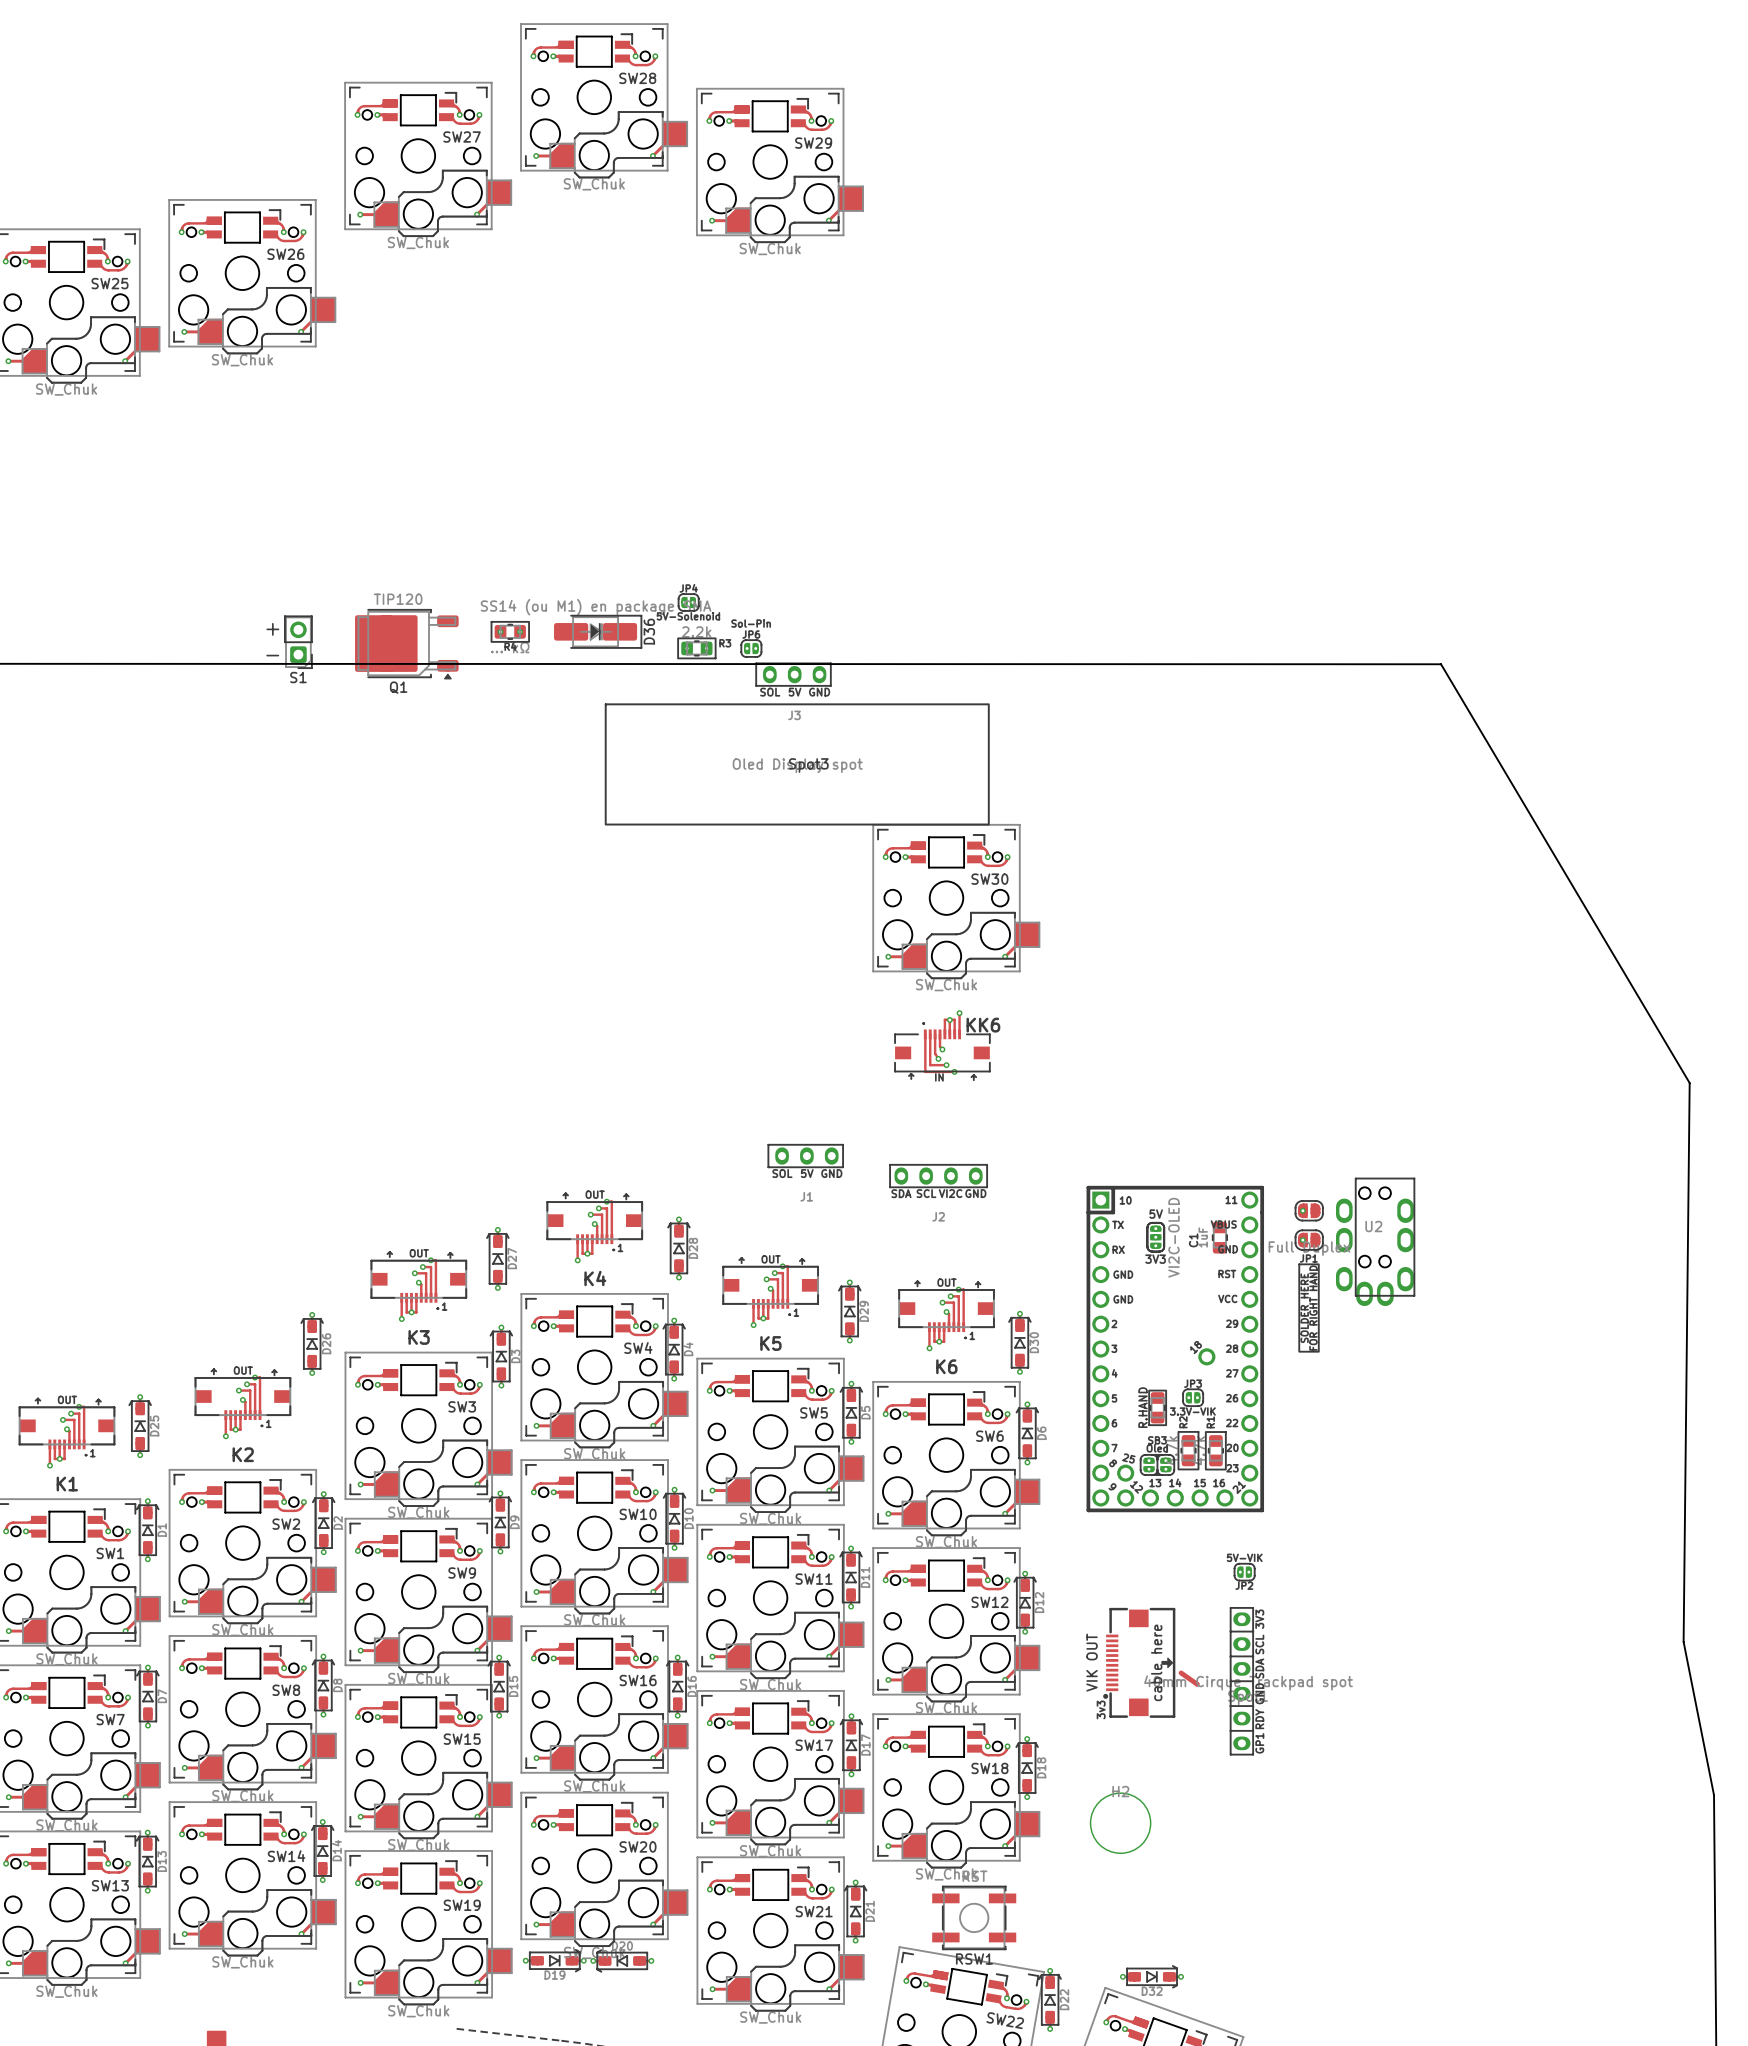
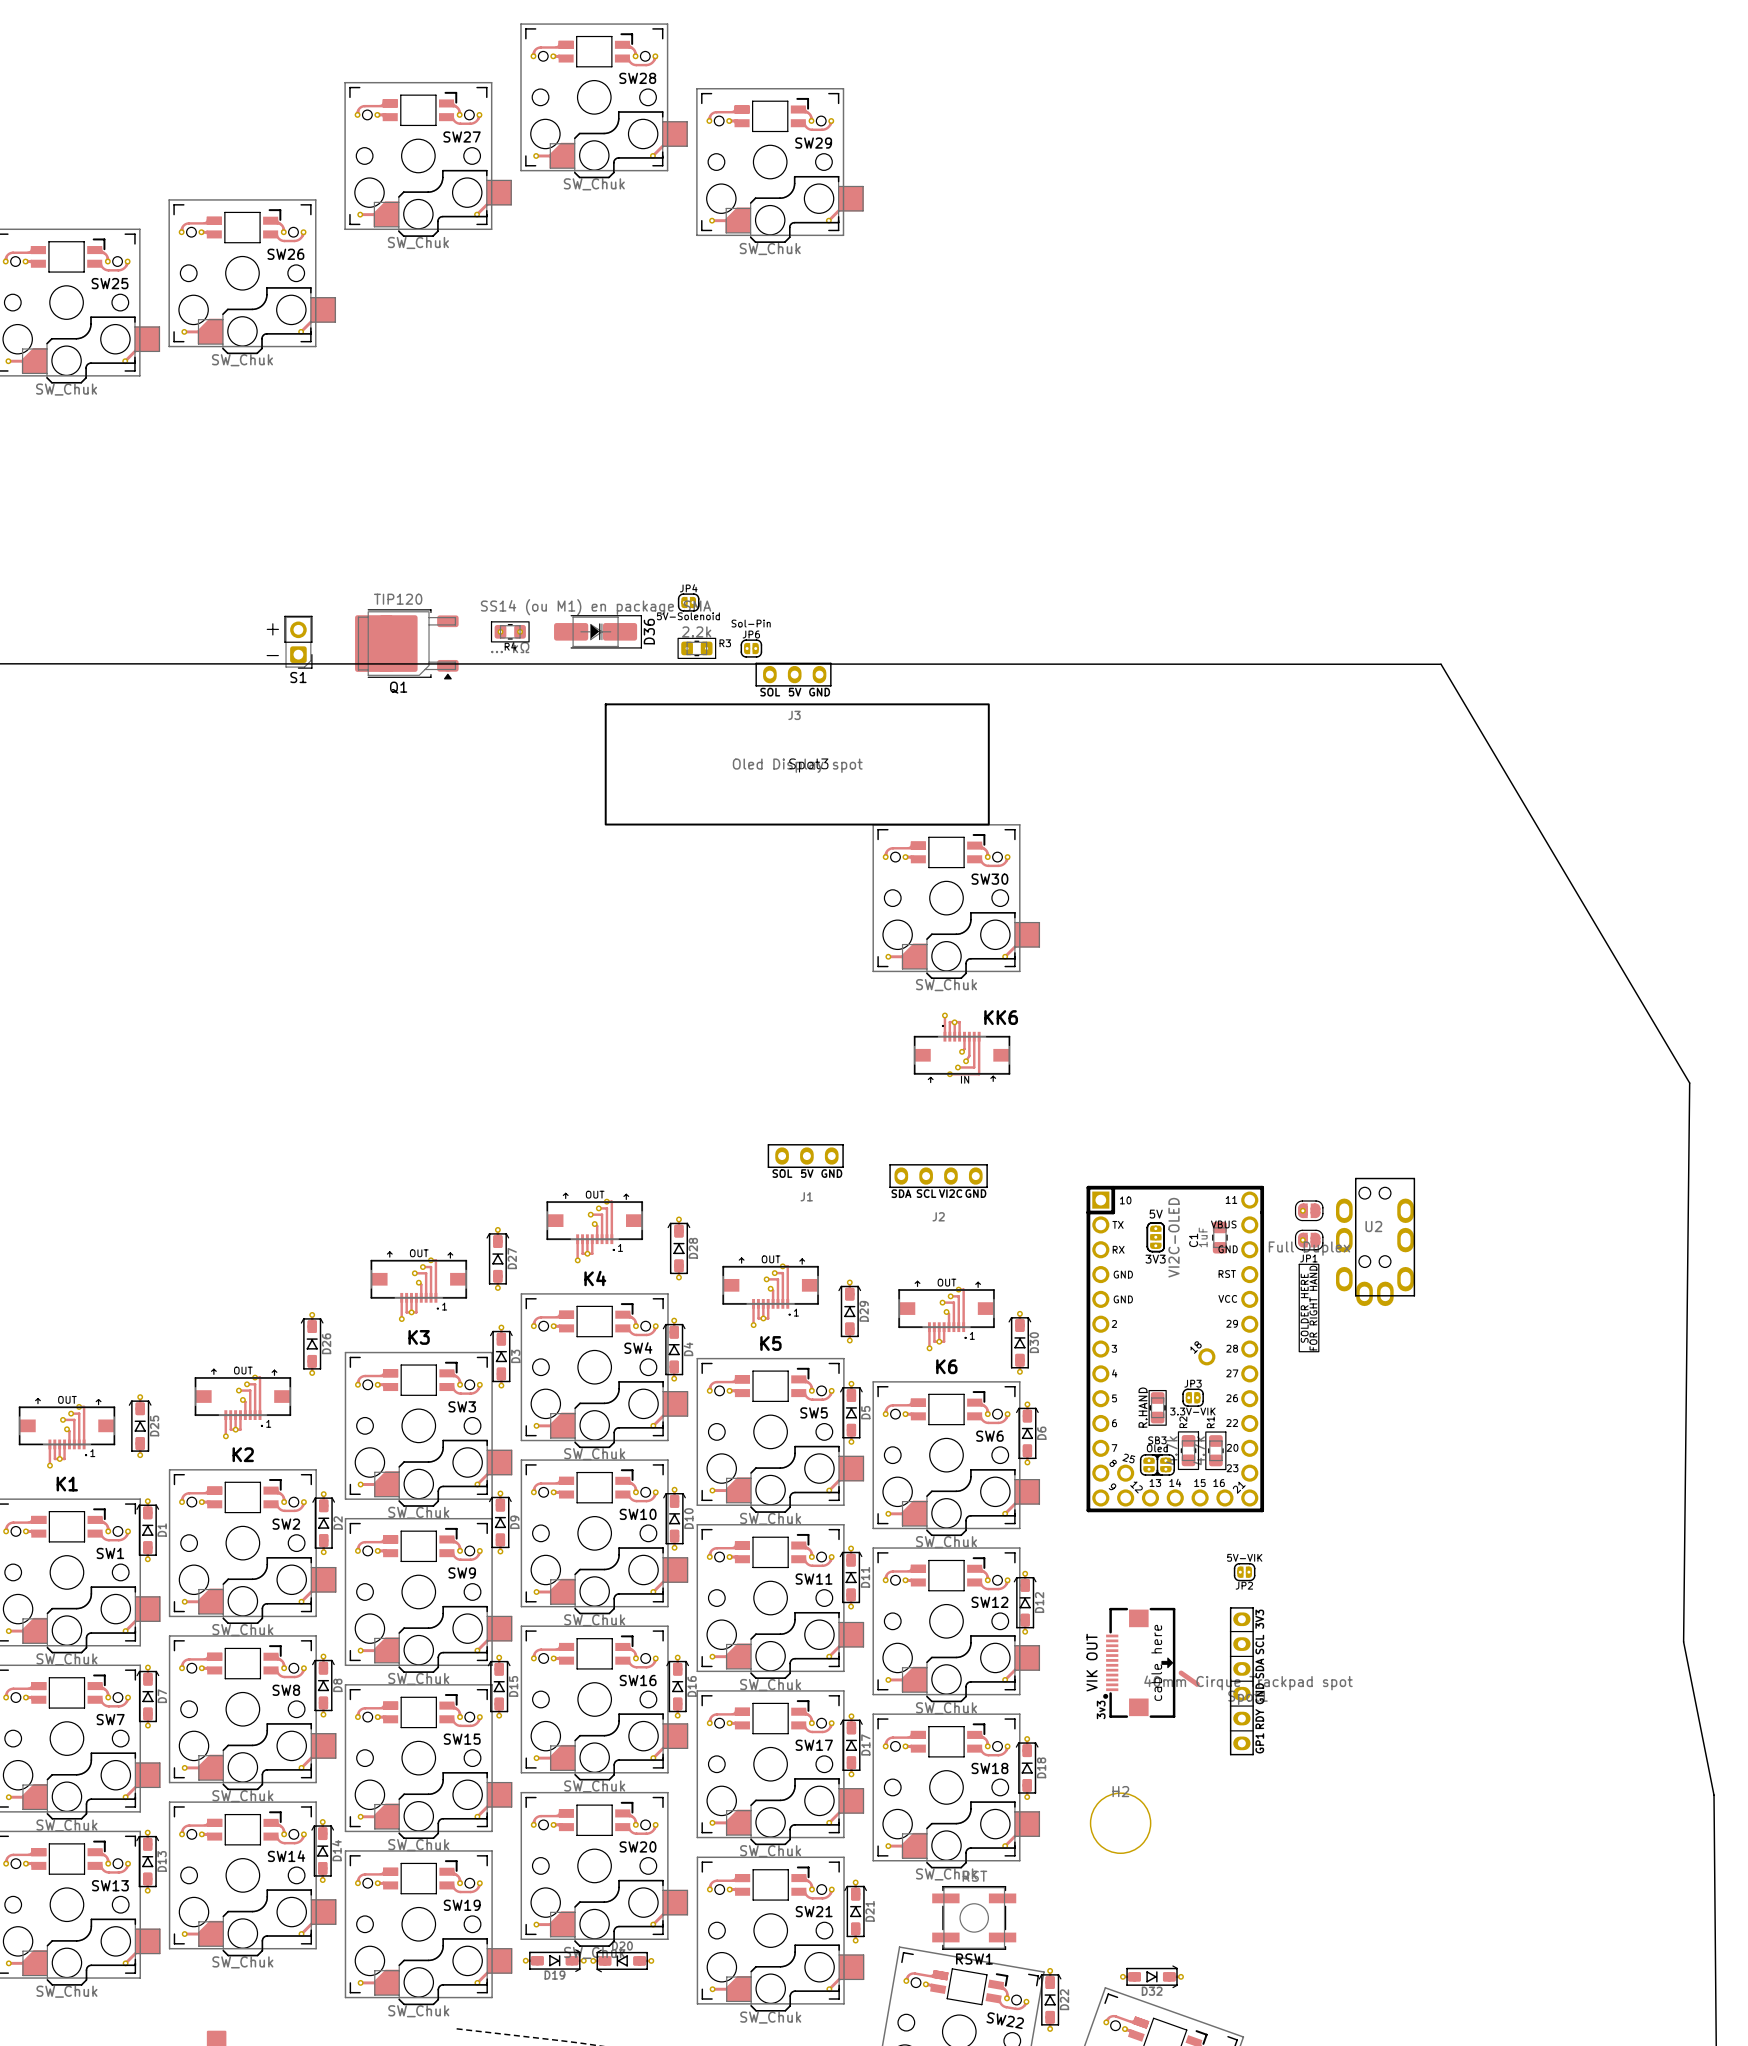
KK6 side: bottom (942, 1045) -> top (962, 1047)

